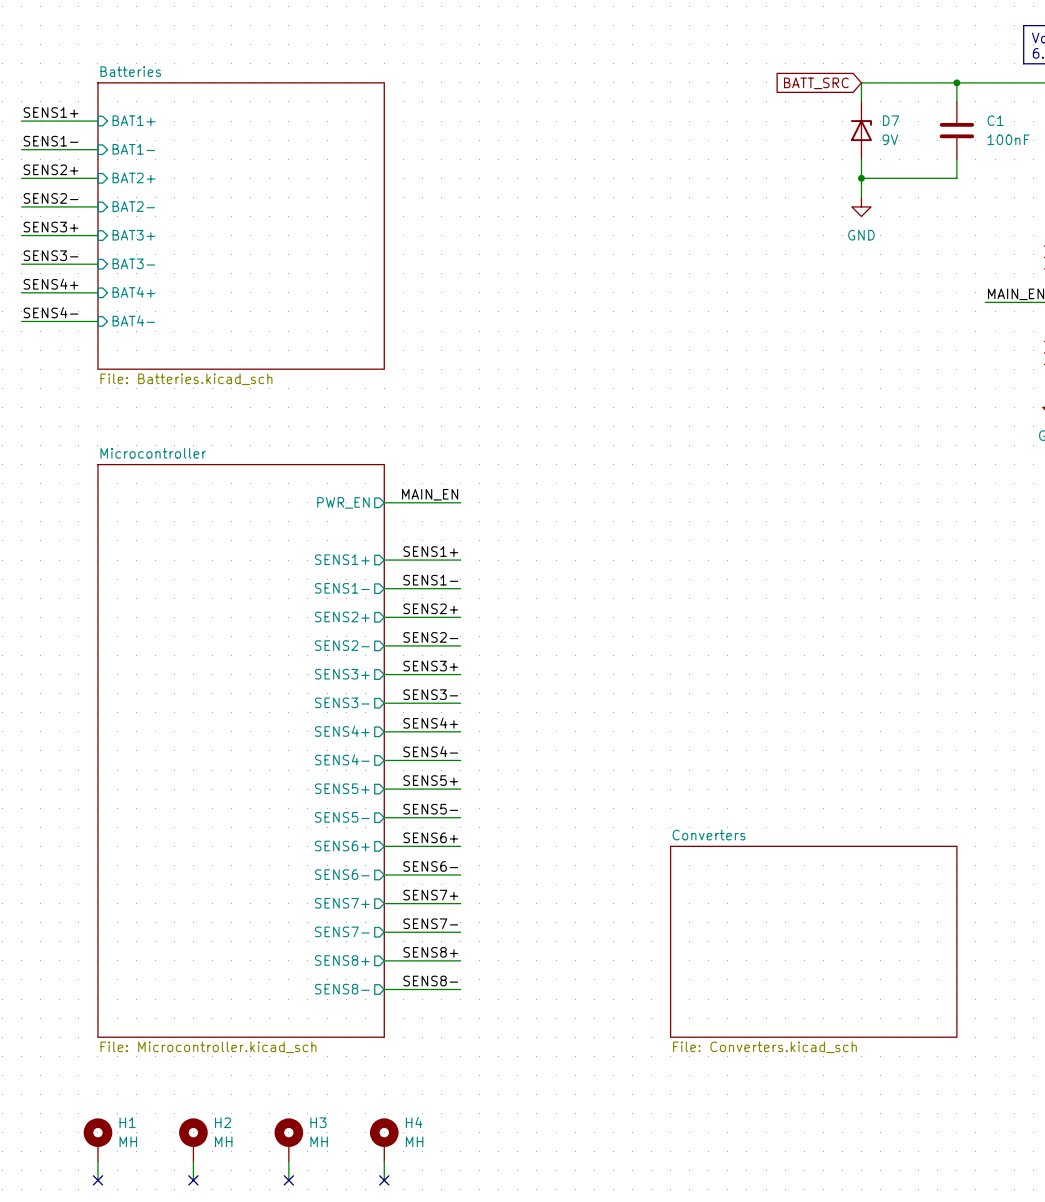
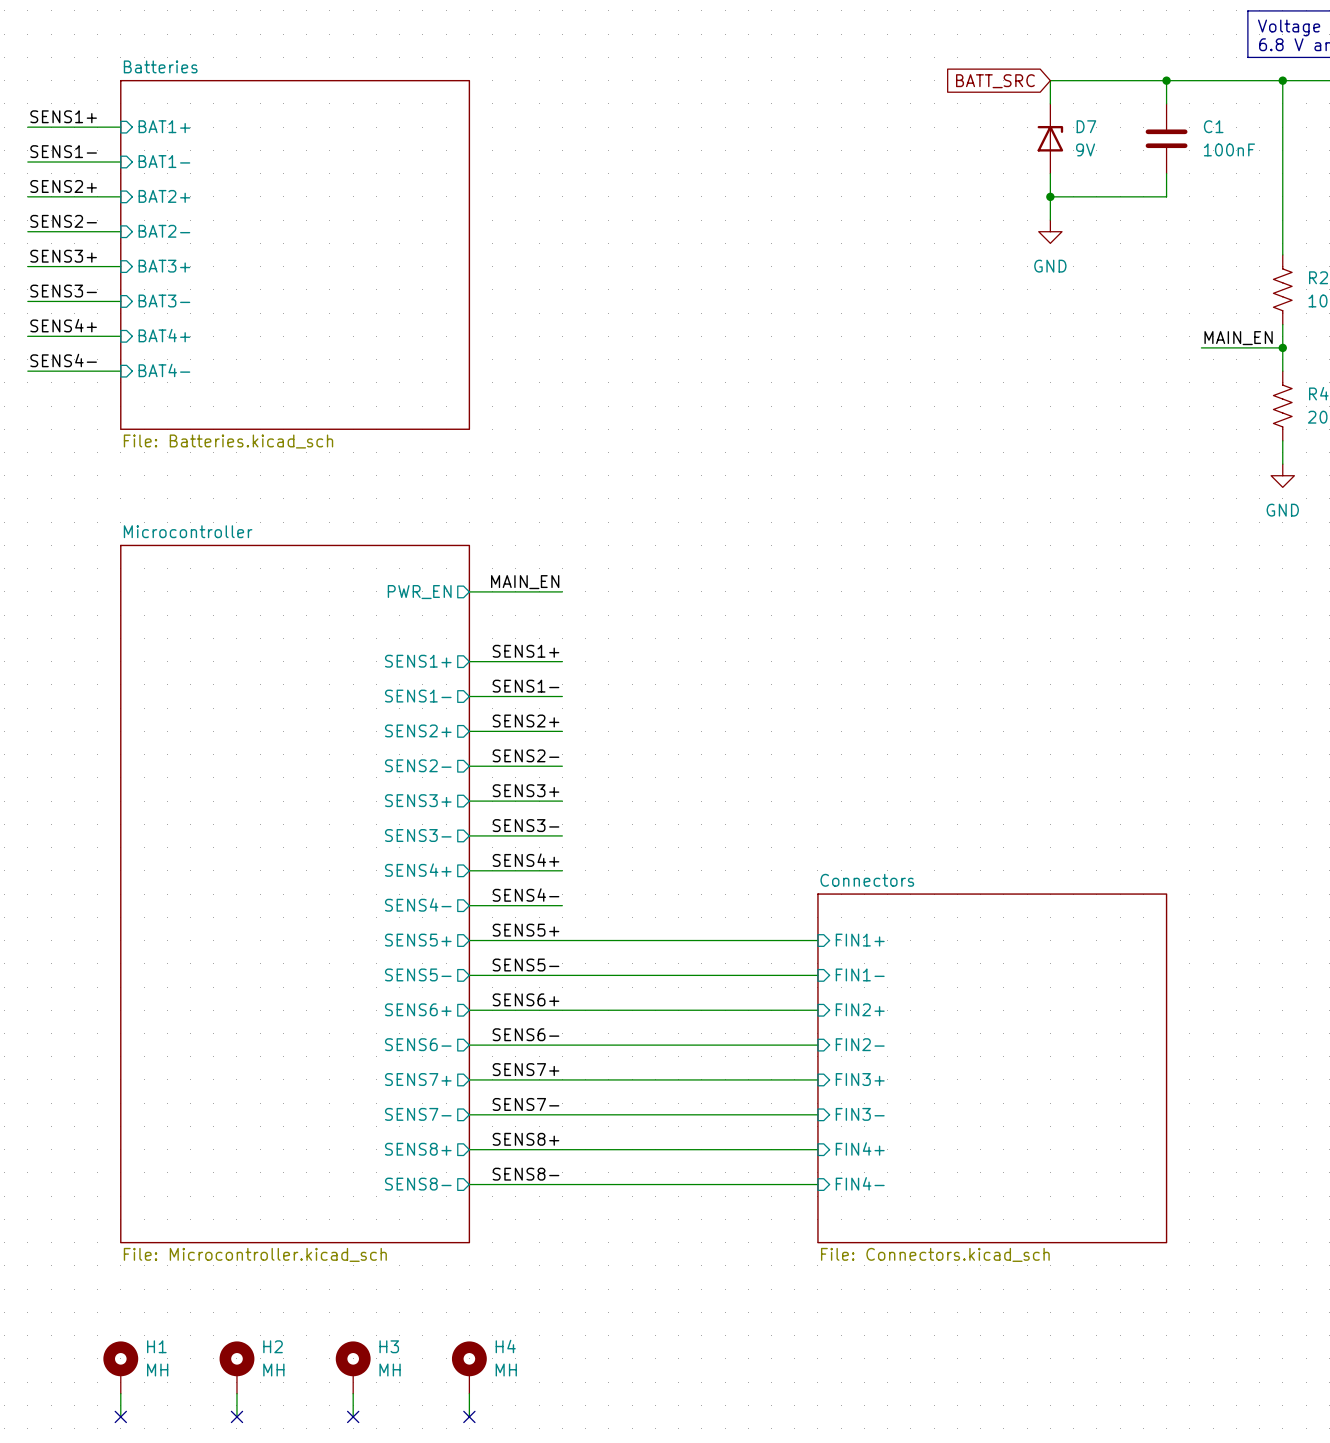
sheet pin: none -> FIN1+ (860, 940)
wire: none -> (562, 940) (817, 940)
wire: none -> (562, 975) (817, 975)
sheet pin: none -> FIN1- (860, 974)
sheet pin: none -> FIN2+ (860, 1009)
wire: none -> (562, 1010) (817, 1010)
wire: none -> (562, 1045) (817, 1045)
sheet pin: none -> FIN2- (860, 1044)
sheet Connectors: none -> File: Connectors.kicad_sch (992, 1068)
wire: none -> (562, 1079) (817, 1079)
sheet pin: none -> FIN3+ (860, 1079)
sheet pin: none -> FIN3- (860, 1114)
wire: none -> (562, 1114) (817, 1114)
sheet Converters: File: Converters.kicad_sch (813, 941) -> none
wire: none -> (562, 1149) (817, 1149)
sheet pin: none -> FIN4+ (860, 1148)
sheet pin: none -> FIN4- (860, 1183)
wire: none -> (562, 1184) (817, 1184)

